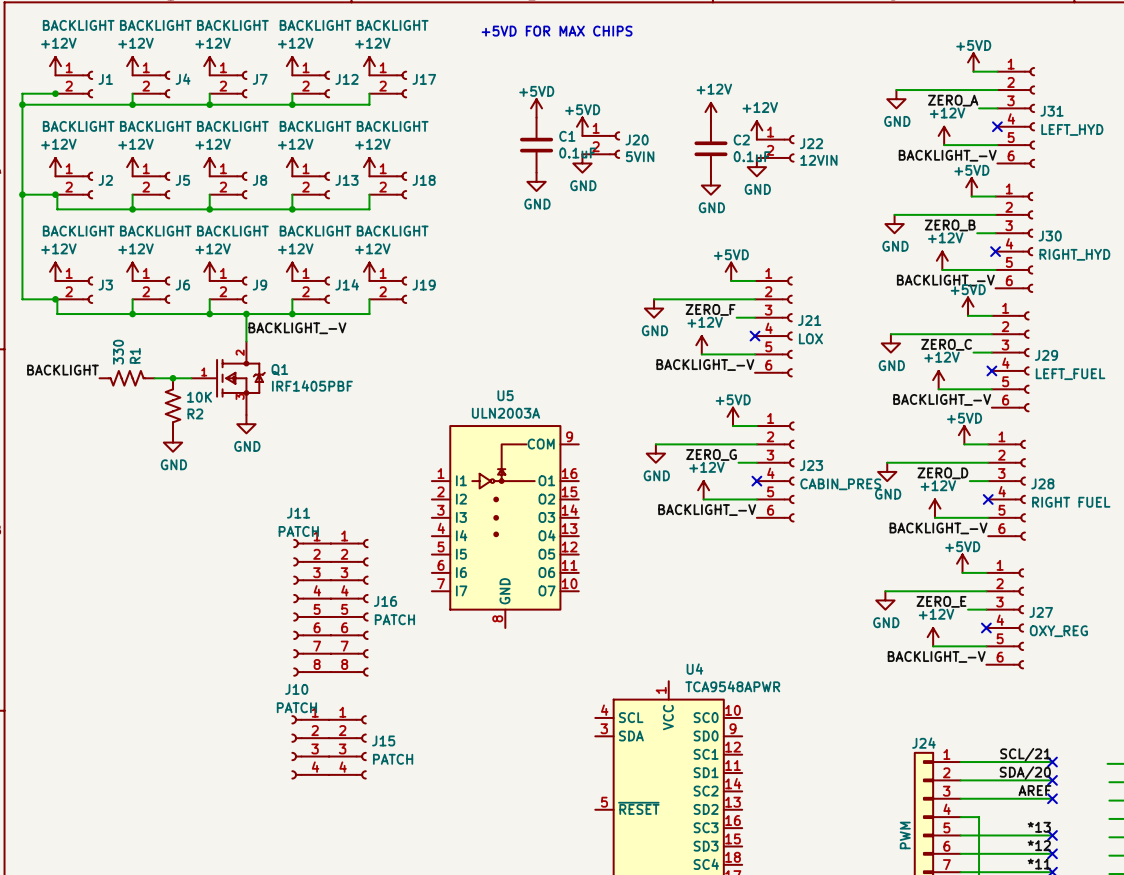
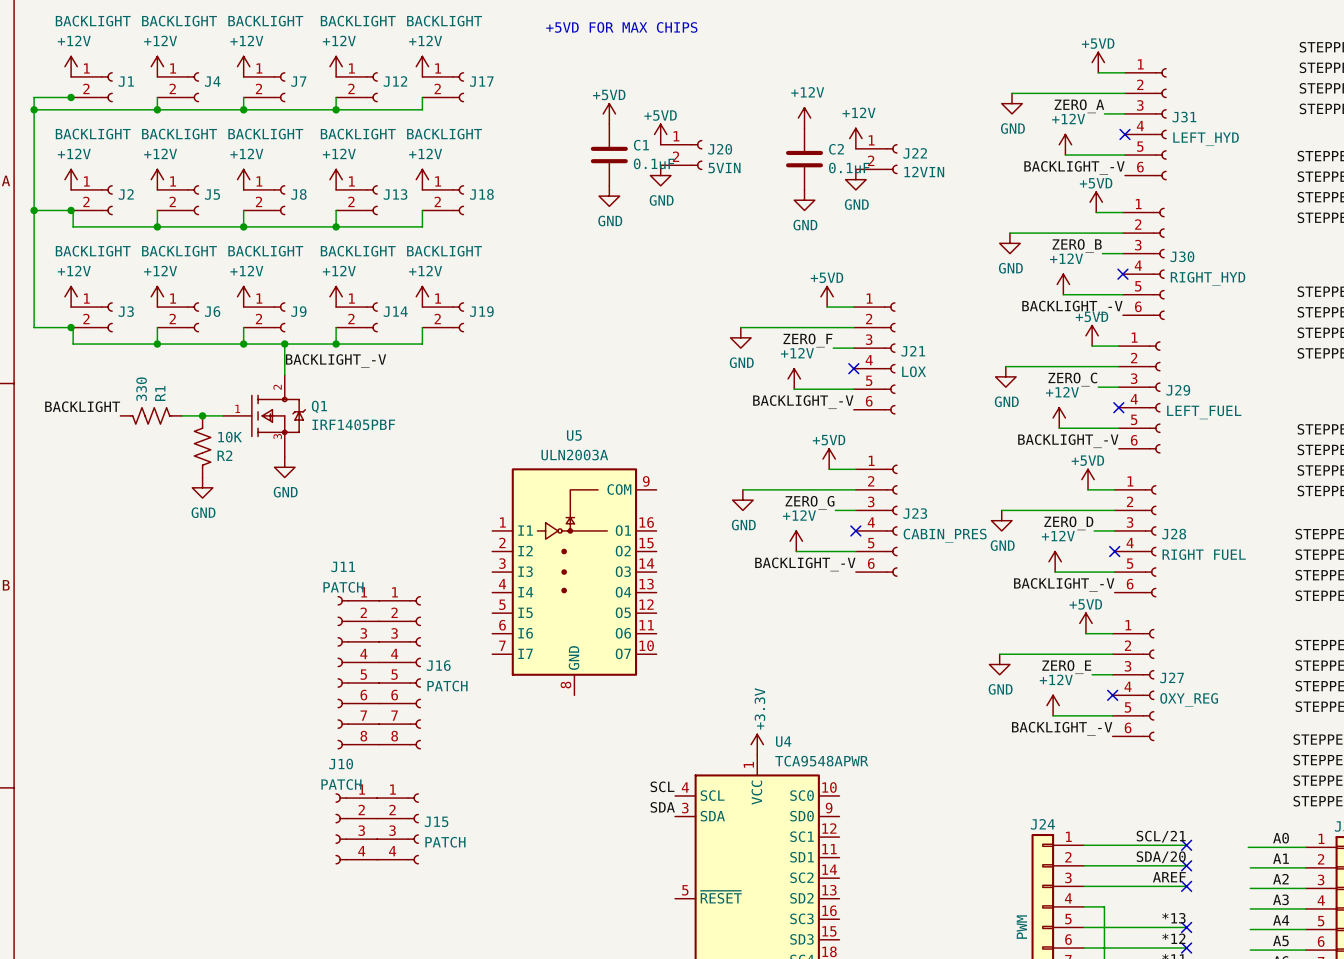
power symbol: none -> +3.3V (757, 744)
label: none -> SCL (662, 786)
label: none -> SDA (662, 807)

